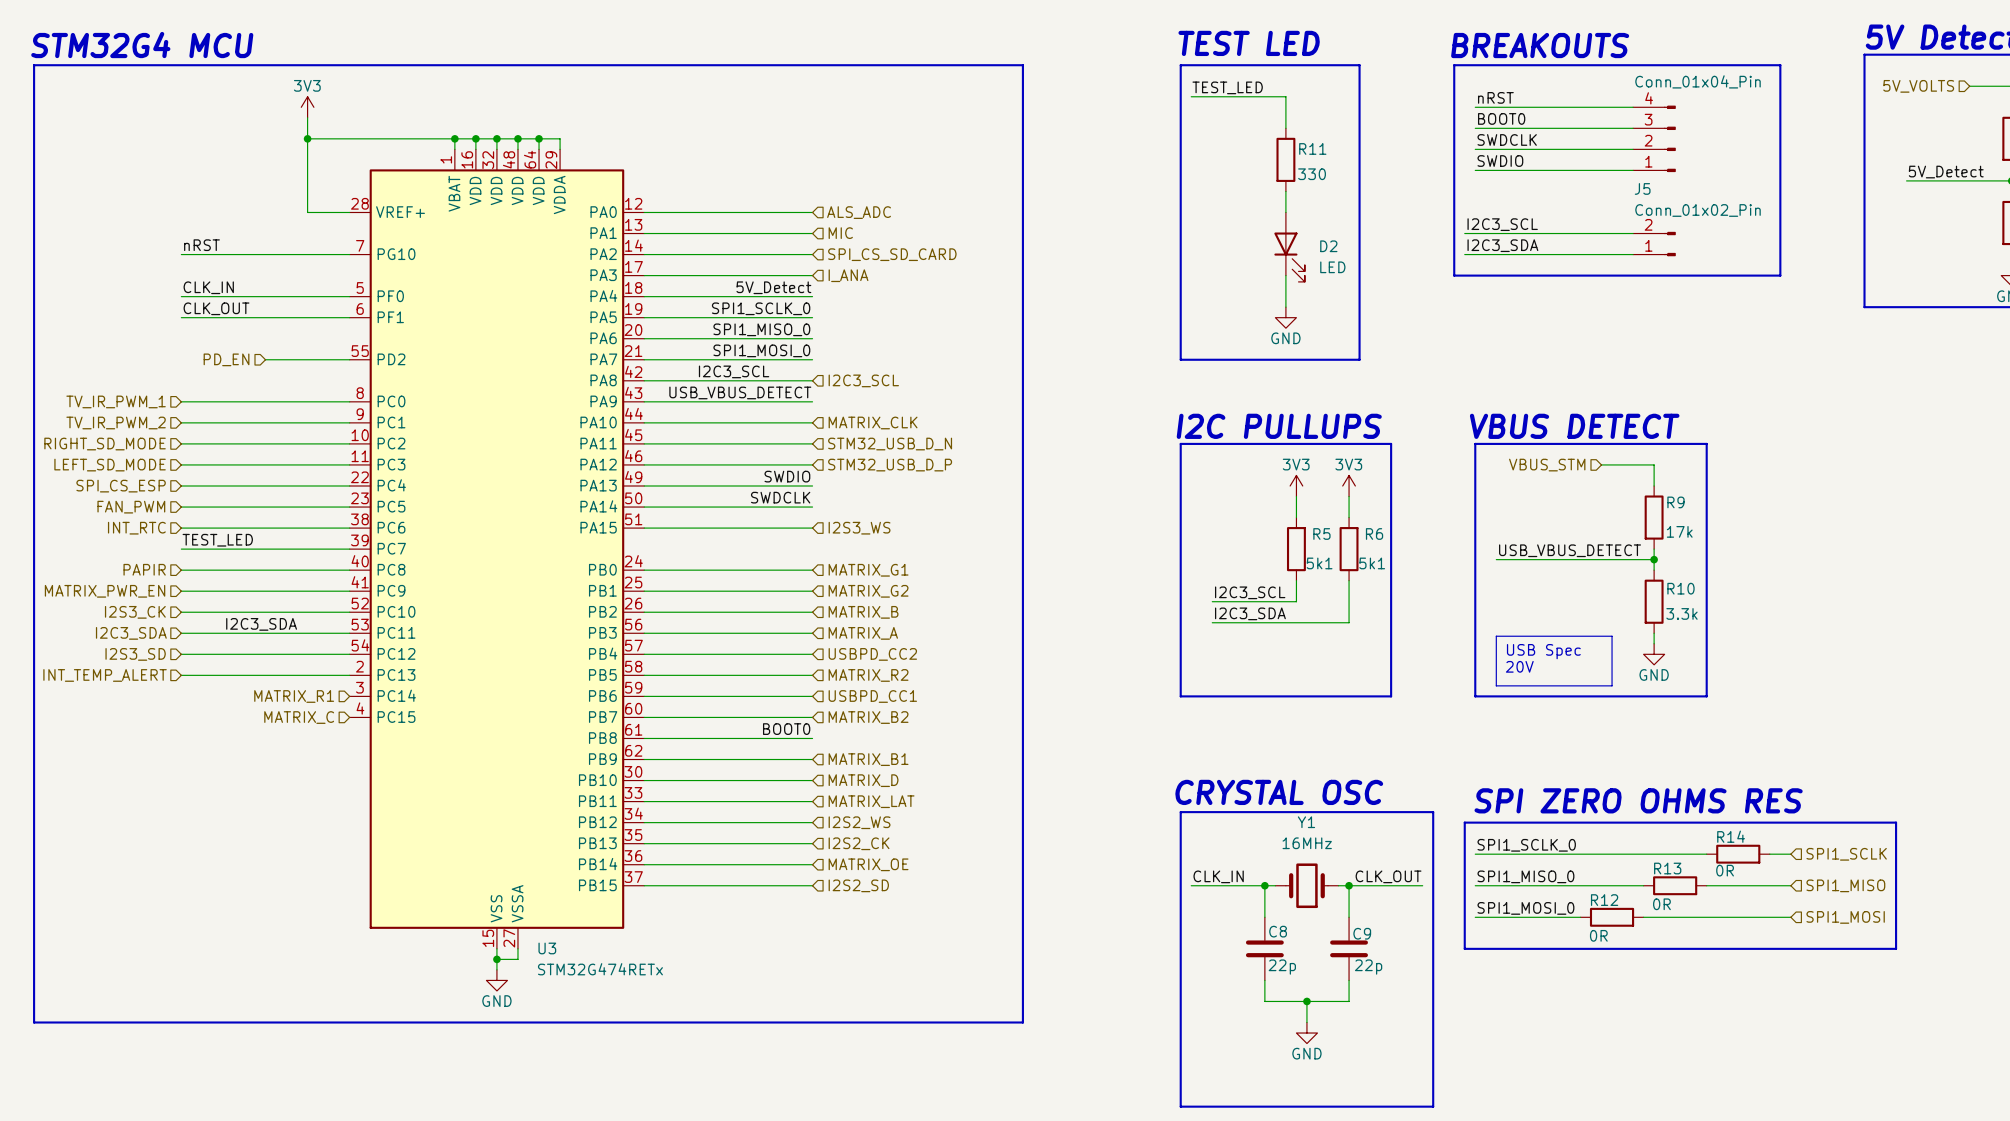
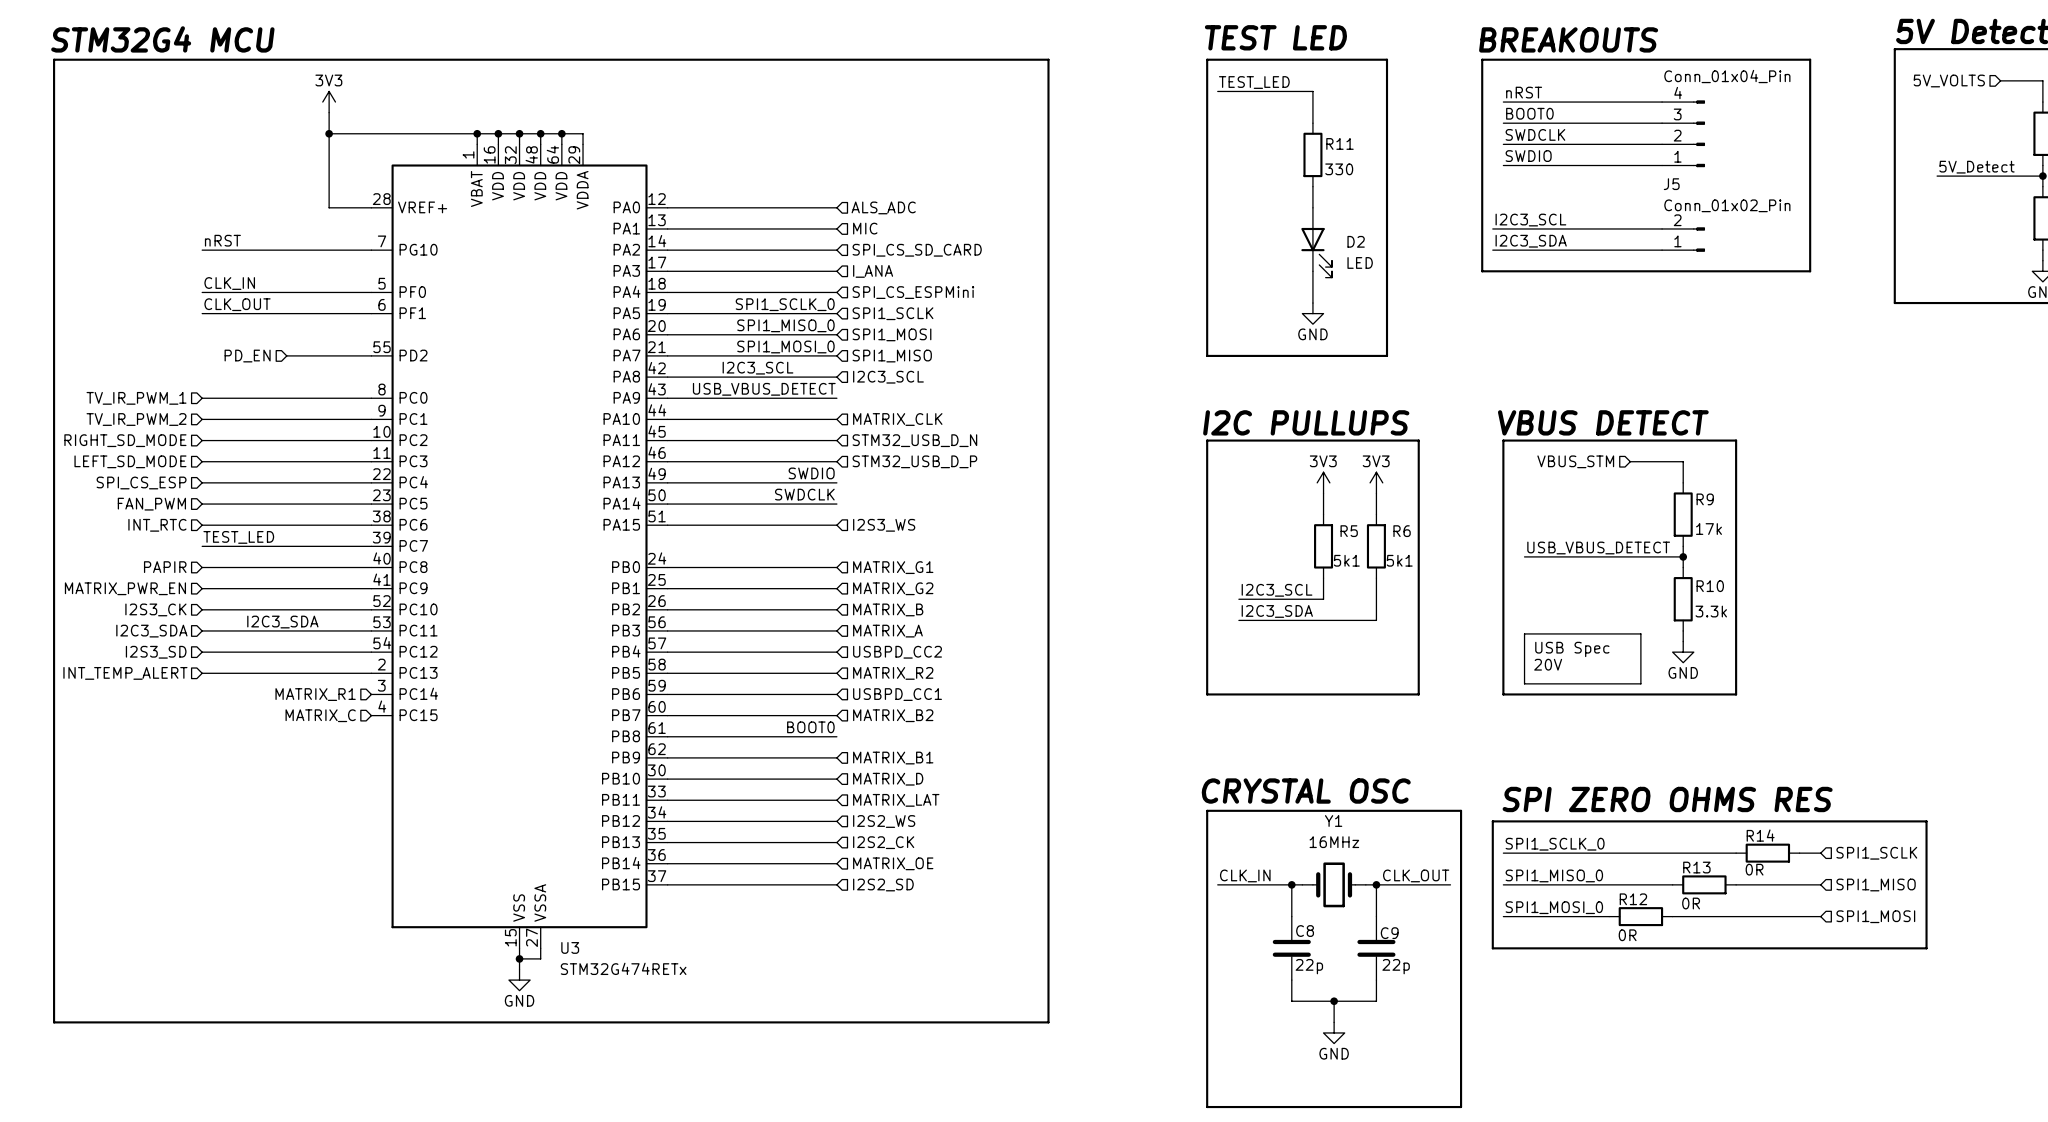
label: 5V_Detect (773, 287) -> none
hierarchical label: none -> SPI_CS_ESPMini (913, 292)
hierarchical label: none -> SPI1_SCLK (892, 313)
hierarchical label: none -> SPI1_MOSI (891, 334)
hierarchical label: none -> SPI1_MISO (892, 356)

